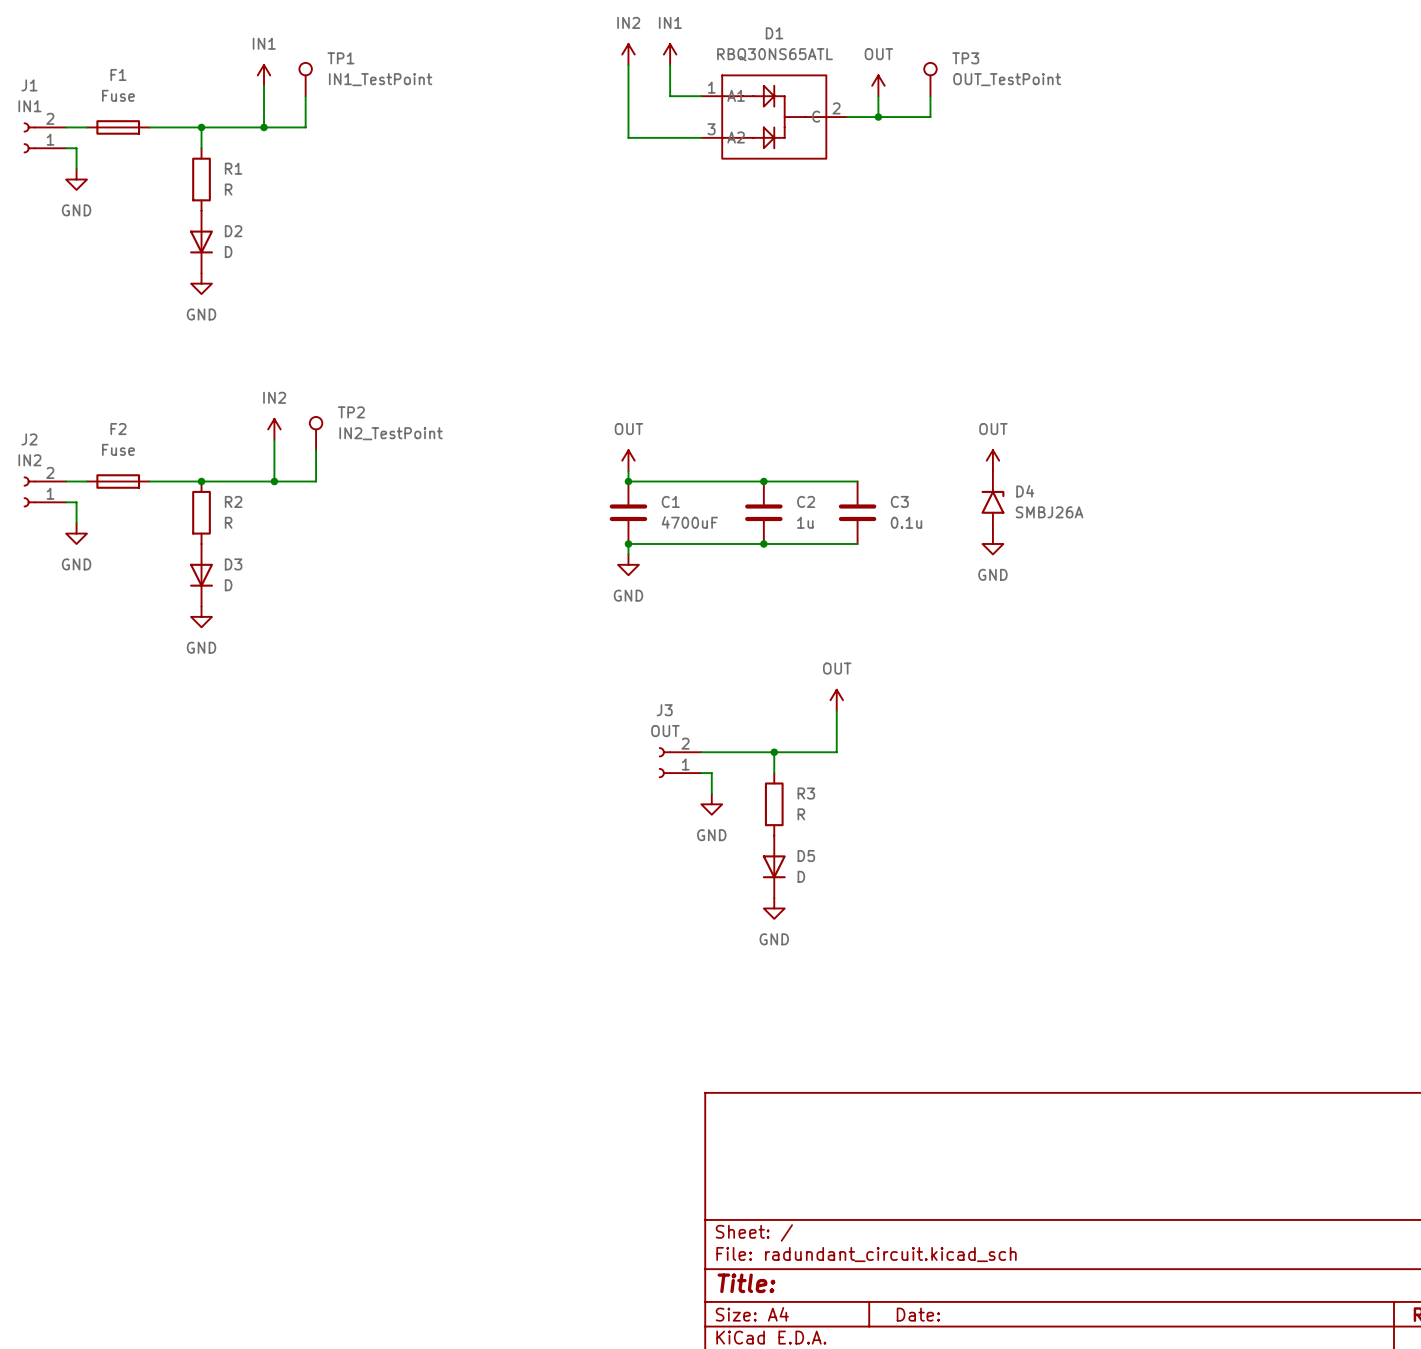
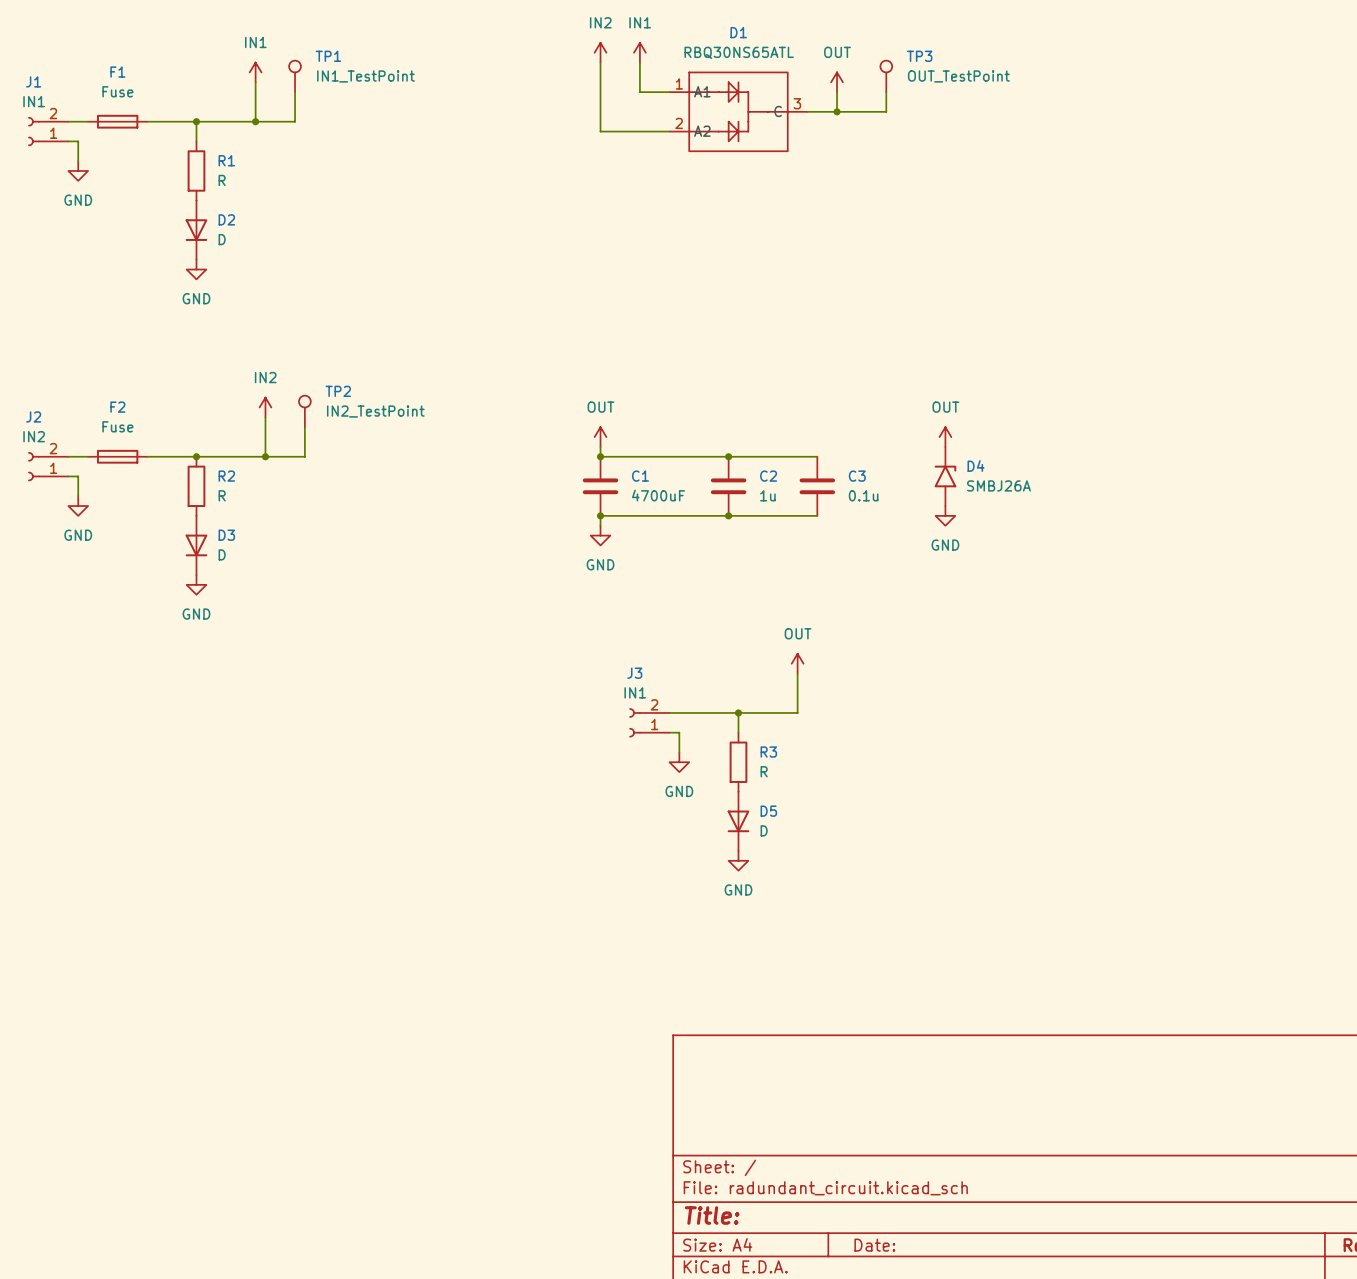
D1 pin number: 2 (836, 108) -> 3 (797, 103)
D1 pin number: 3 (711, 129) -> 2 (679, 123)
J3 value: OUT (665, 731) -> IN1 (635, 692)

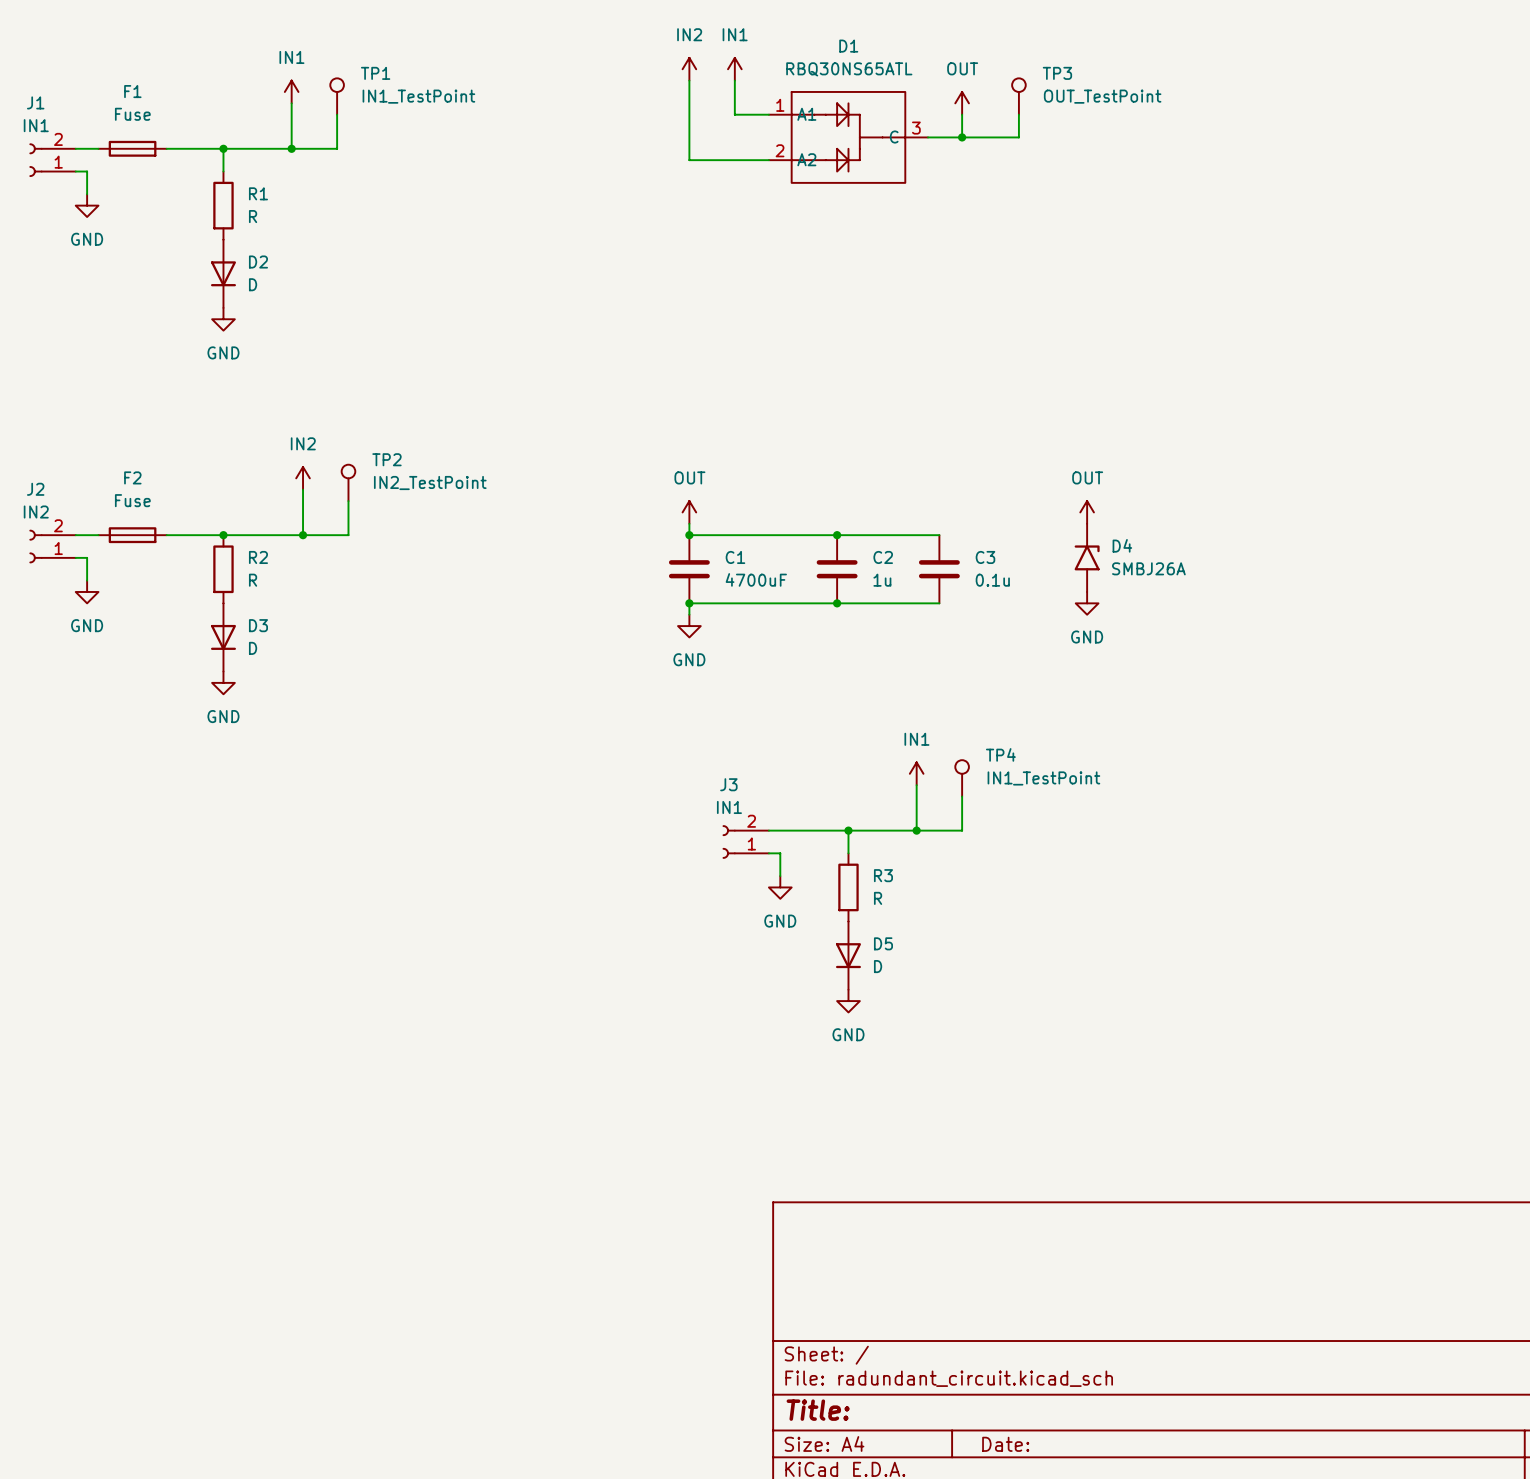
power symbol: OUT (797, 663) -> IN1 (916, 773)
TP4: none -> IN1_TestPoint (962, 778)
wire: none -> (962, 796) (962, 830) (916, 830)
junction: none -> (916, 830)

